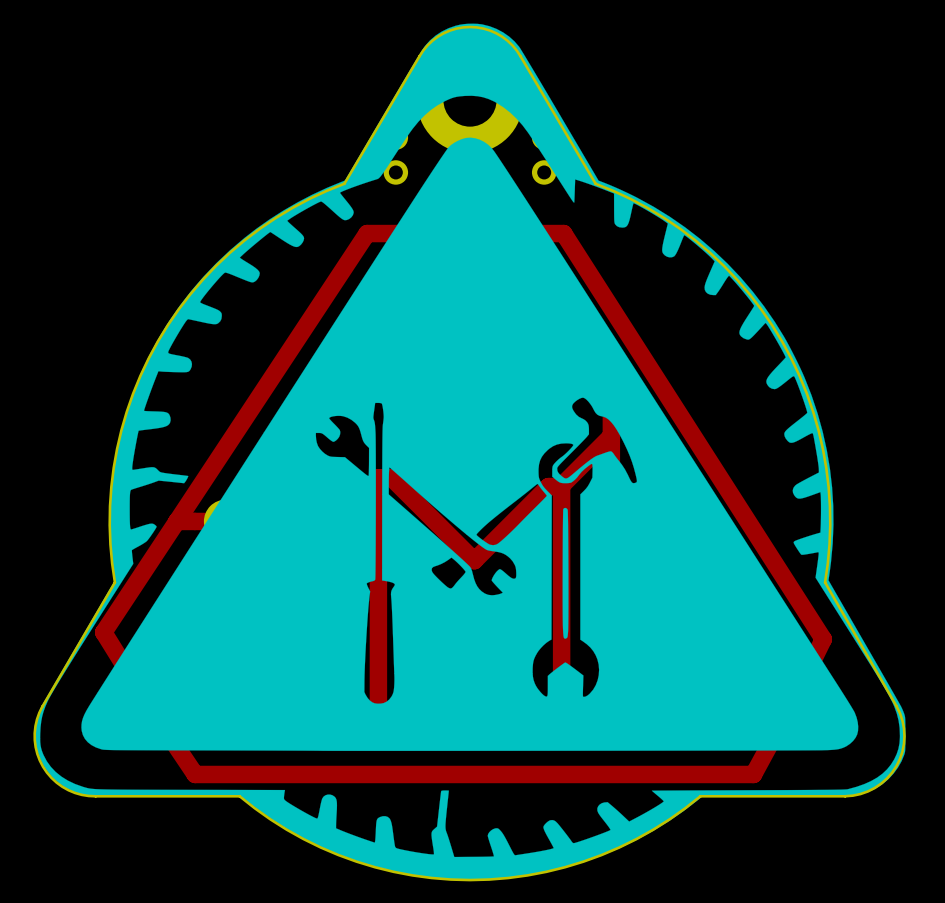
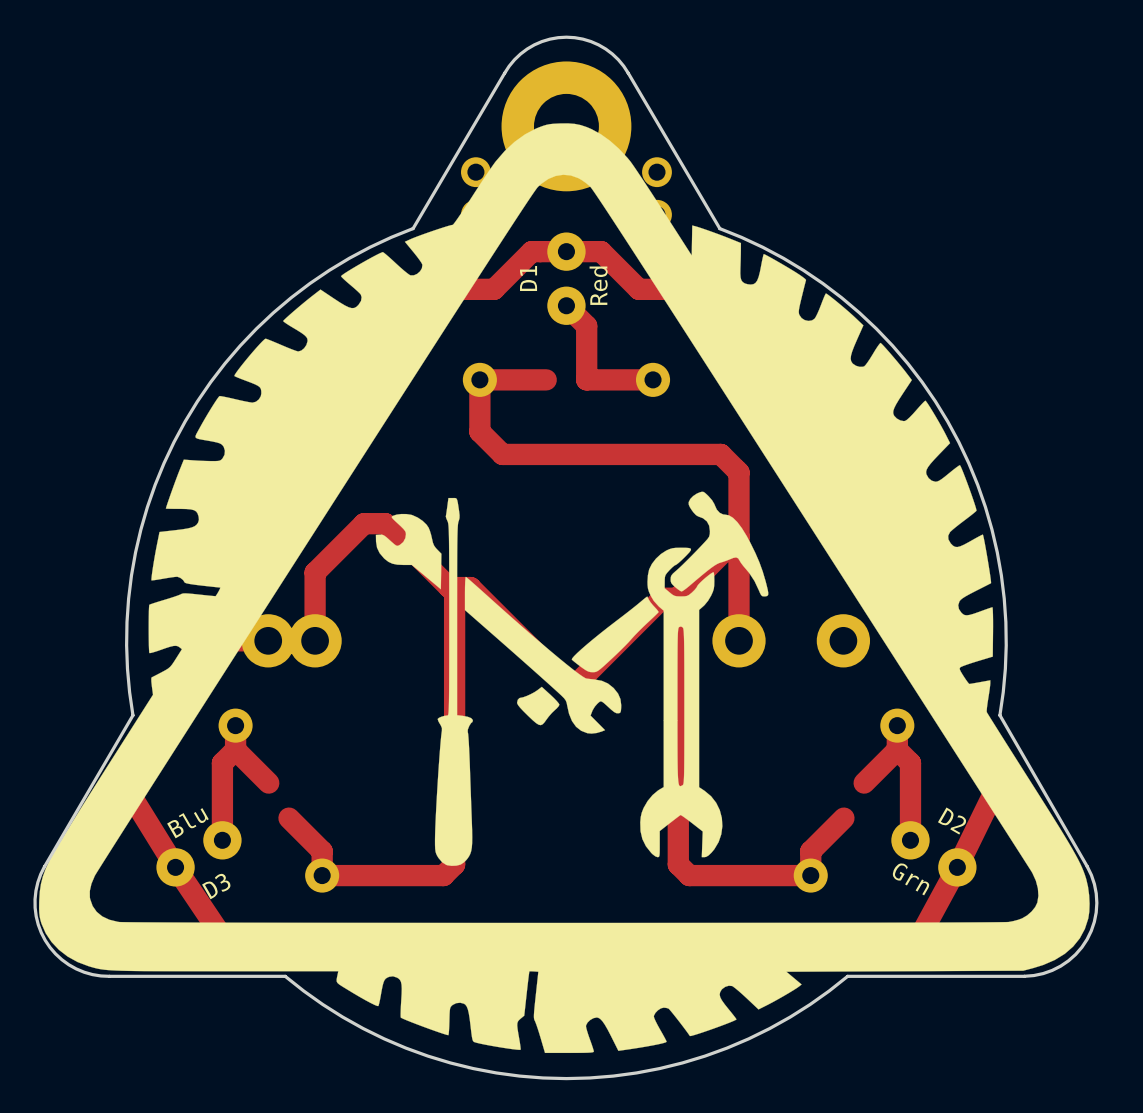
drawing: [35, 23, 906, 880] -> none
drawing: none -> [39, 123, 1090, 1054]
track: none -> (454, 587) (449, 587) (385, 523) (364, 523) (315, 572) (315, 640)

